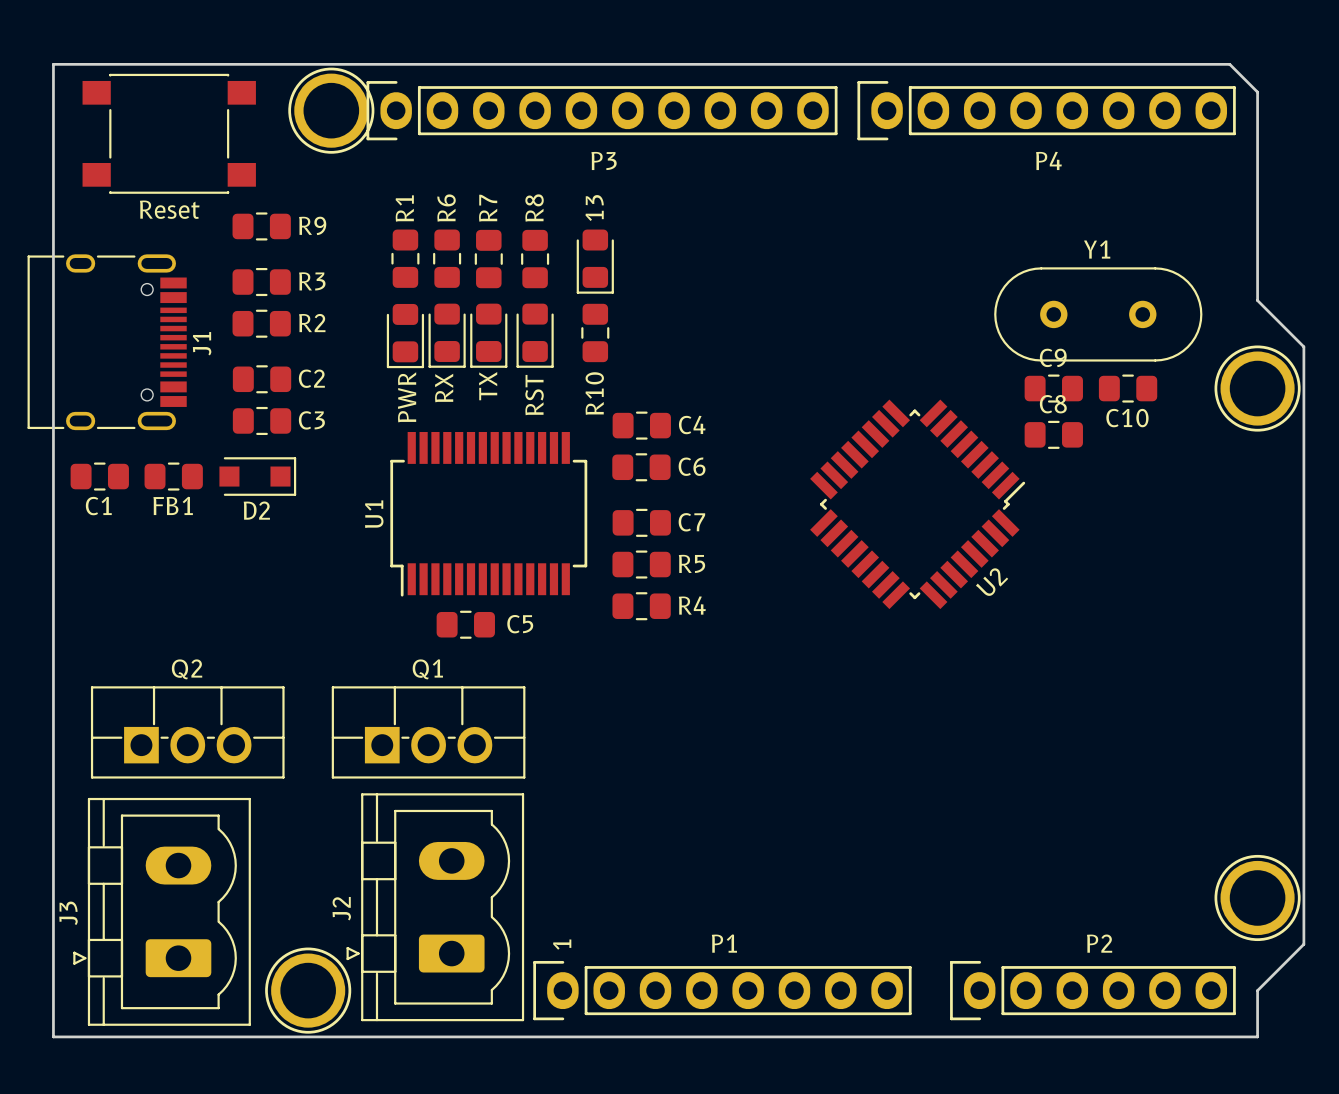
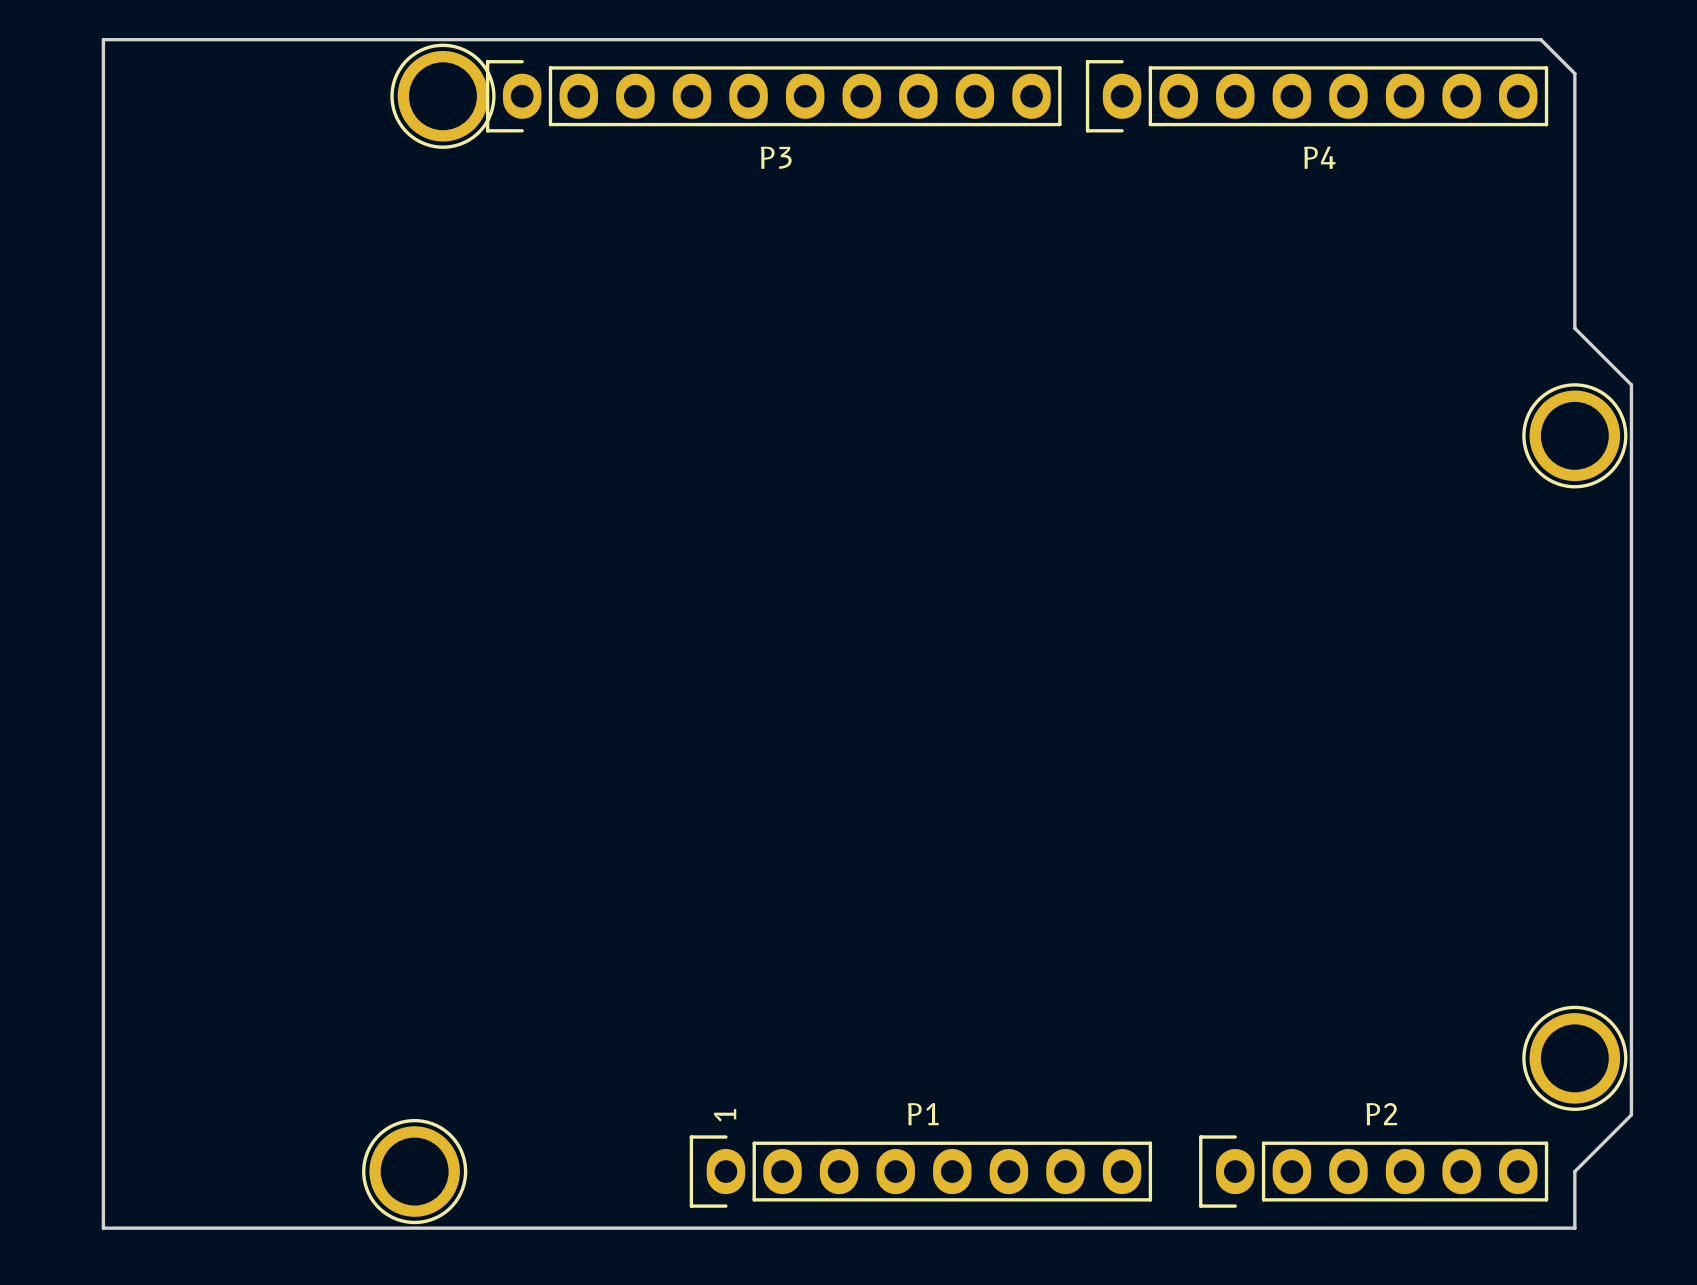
Reset: (169, 133) -> none
R9: (261, 226) -> none
R1: (405, 258) -> none
R6: (447, 258) -> none
R7: (488, 259) -> none
R8: (535, 259) -> none
13: (595, 261) -> none
R3: (261, 282) -> none
Y1: (1098, 314) -> none
R2: (261, 323) -> none
R10: (595, 332) -> none
RX: (447, 335) -> none
TX: (488, 335) -> none
RST: (535, 335) -> none
PWR: (405, 336) -> none
J1: (107, 342) -> none
C2: (262, 379) -> none
C9: (1053, 388) -> none
C10: (1128, 388) -> none
C3: (262, 420) -> none
C4: (641, 425) -> none
C8: (1053, 434) -> none
C6: (641, 467) -> none
C1: (99, 476) -> none
FB1: (173, 476) -> none
D2: (257, 476) -> none
U2: (917, 504) -> none
U1: (488, 514) -> none
C7: (641, 522) -> none
R5: (641, 564) -> none
R4: (641, 606) -> none
C5: (465, 624) -> none
Q2: (187, 732) -> none
Q1: (428, 732) -> none
J2: (435, 907) -> none
J3: (162, 911) -> none

